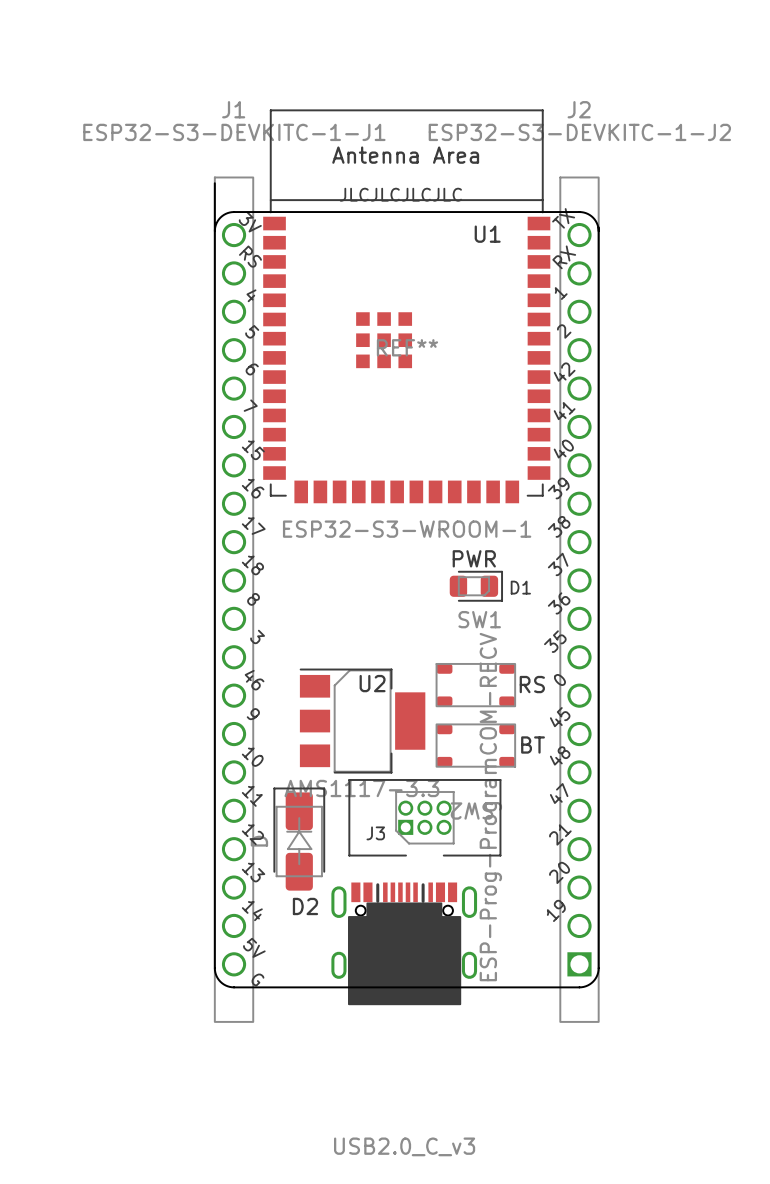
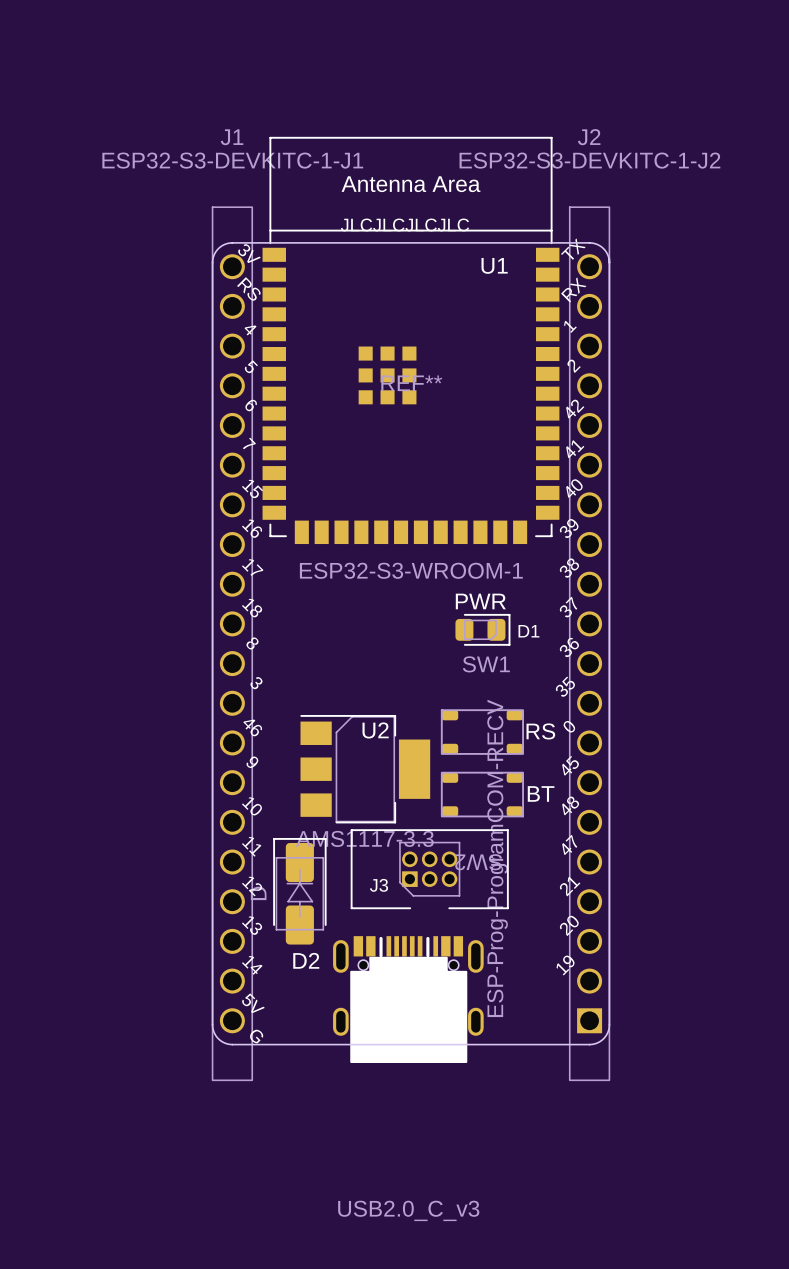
board edge: (214, 183) (214, 231) -> none

